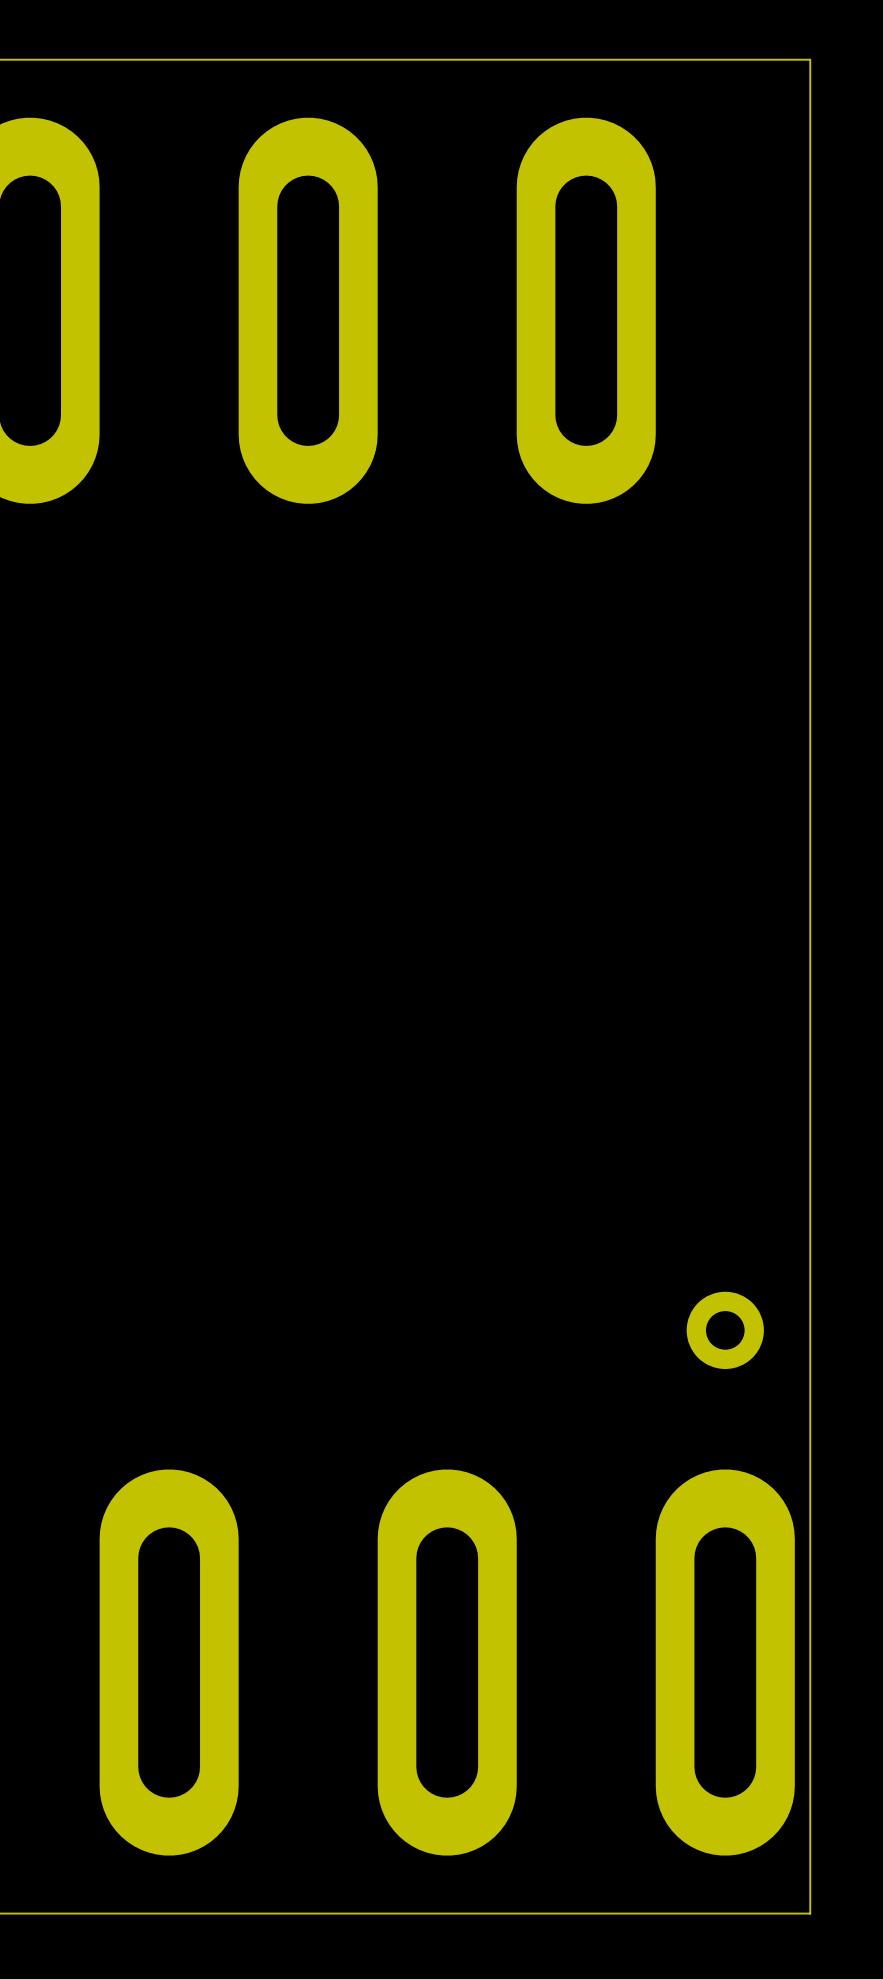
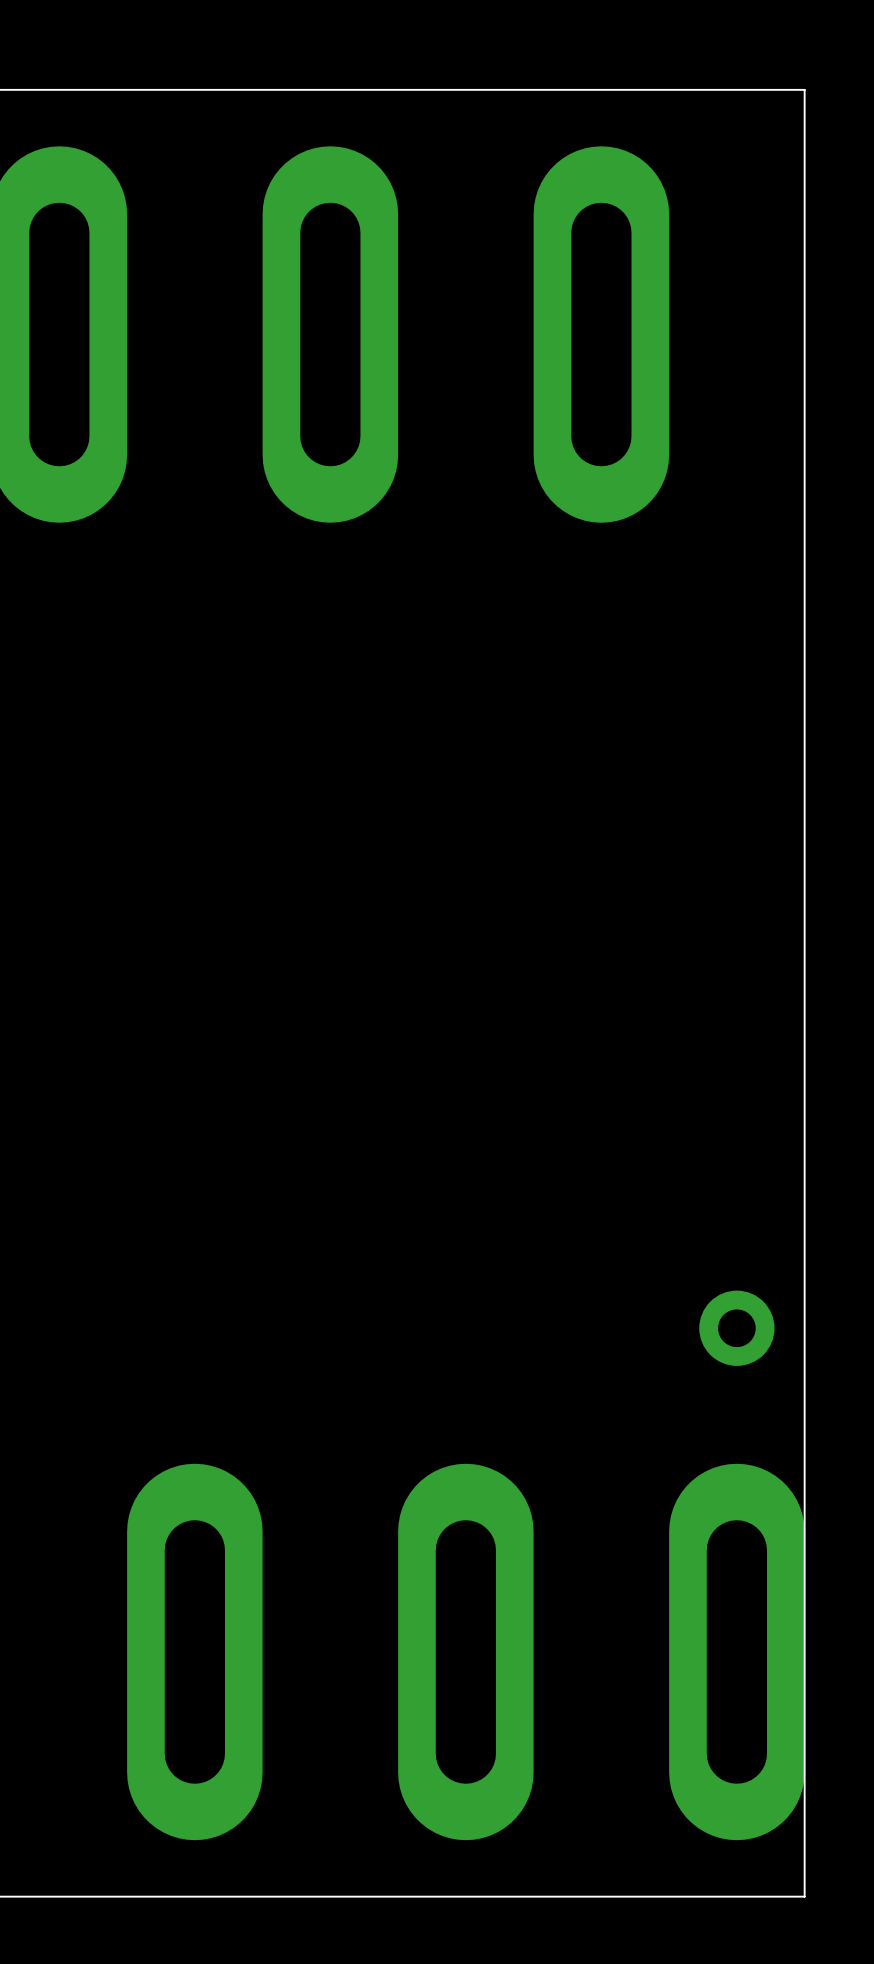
board edge: (794, 59) (810, 59) (810, 1913) (794, 1913) -> (804, 89) (804, 1896)

